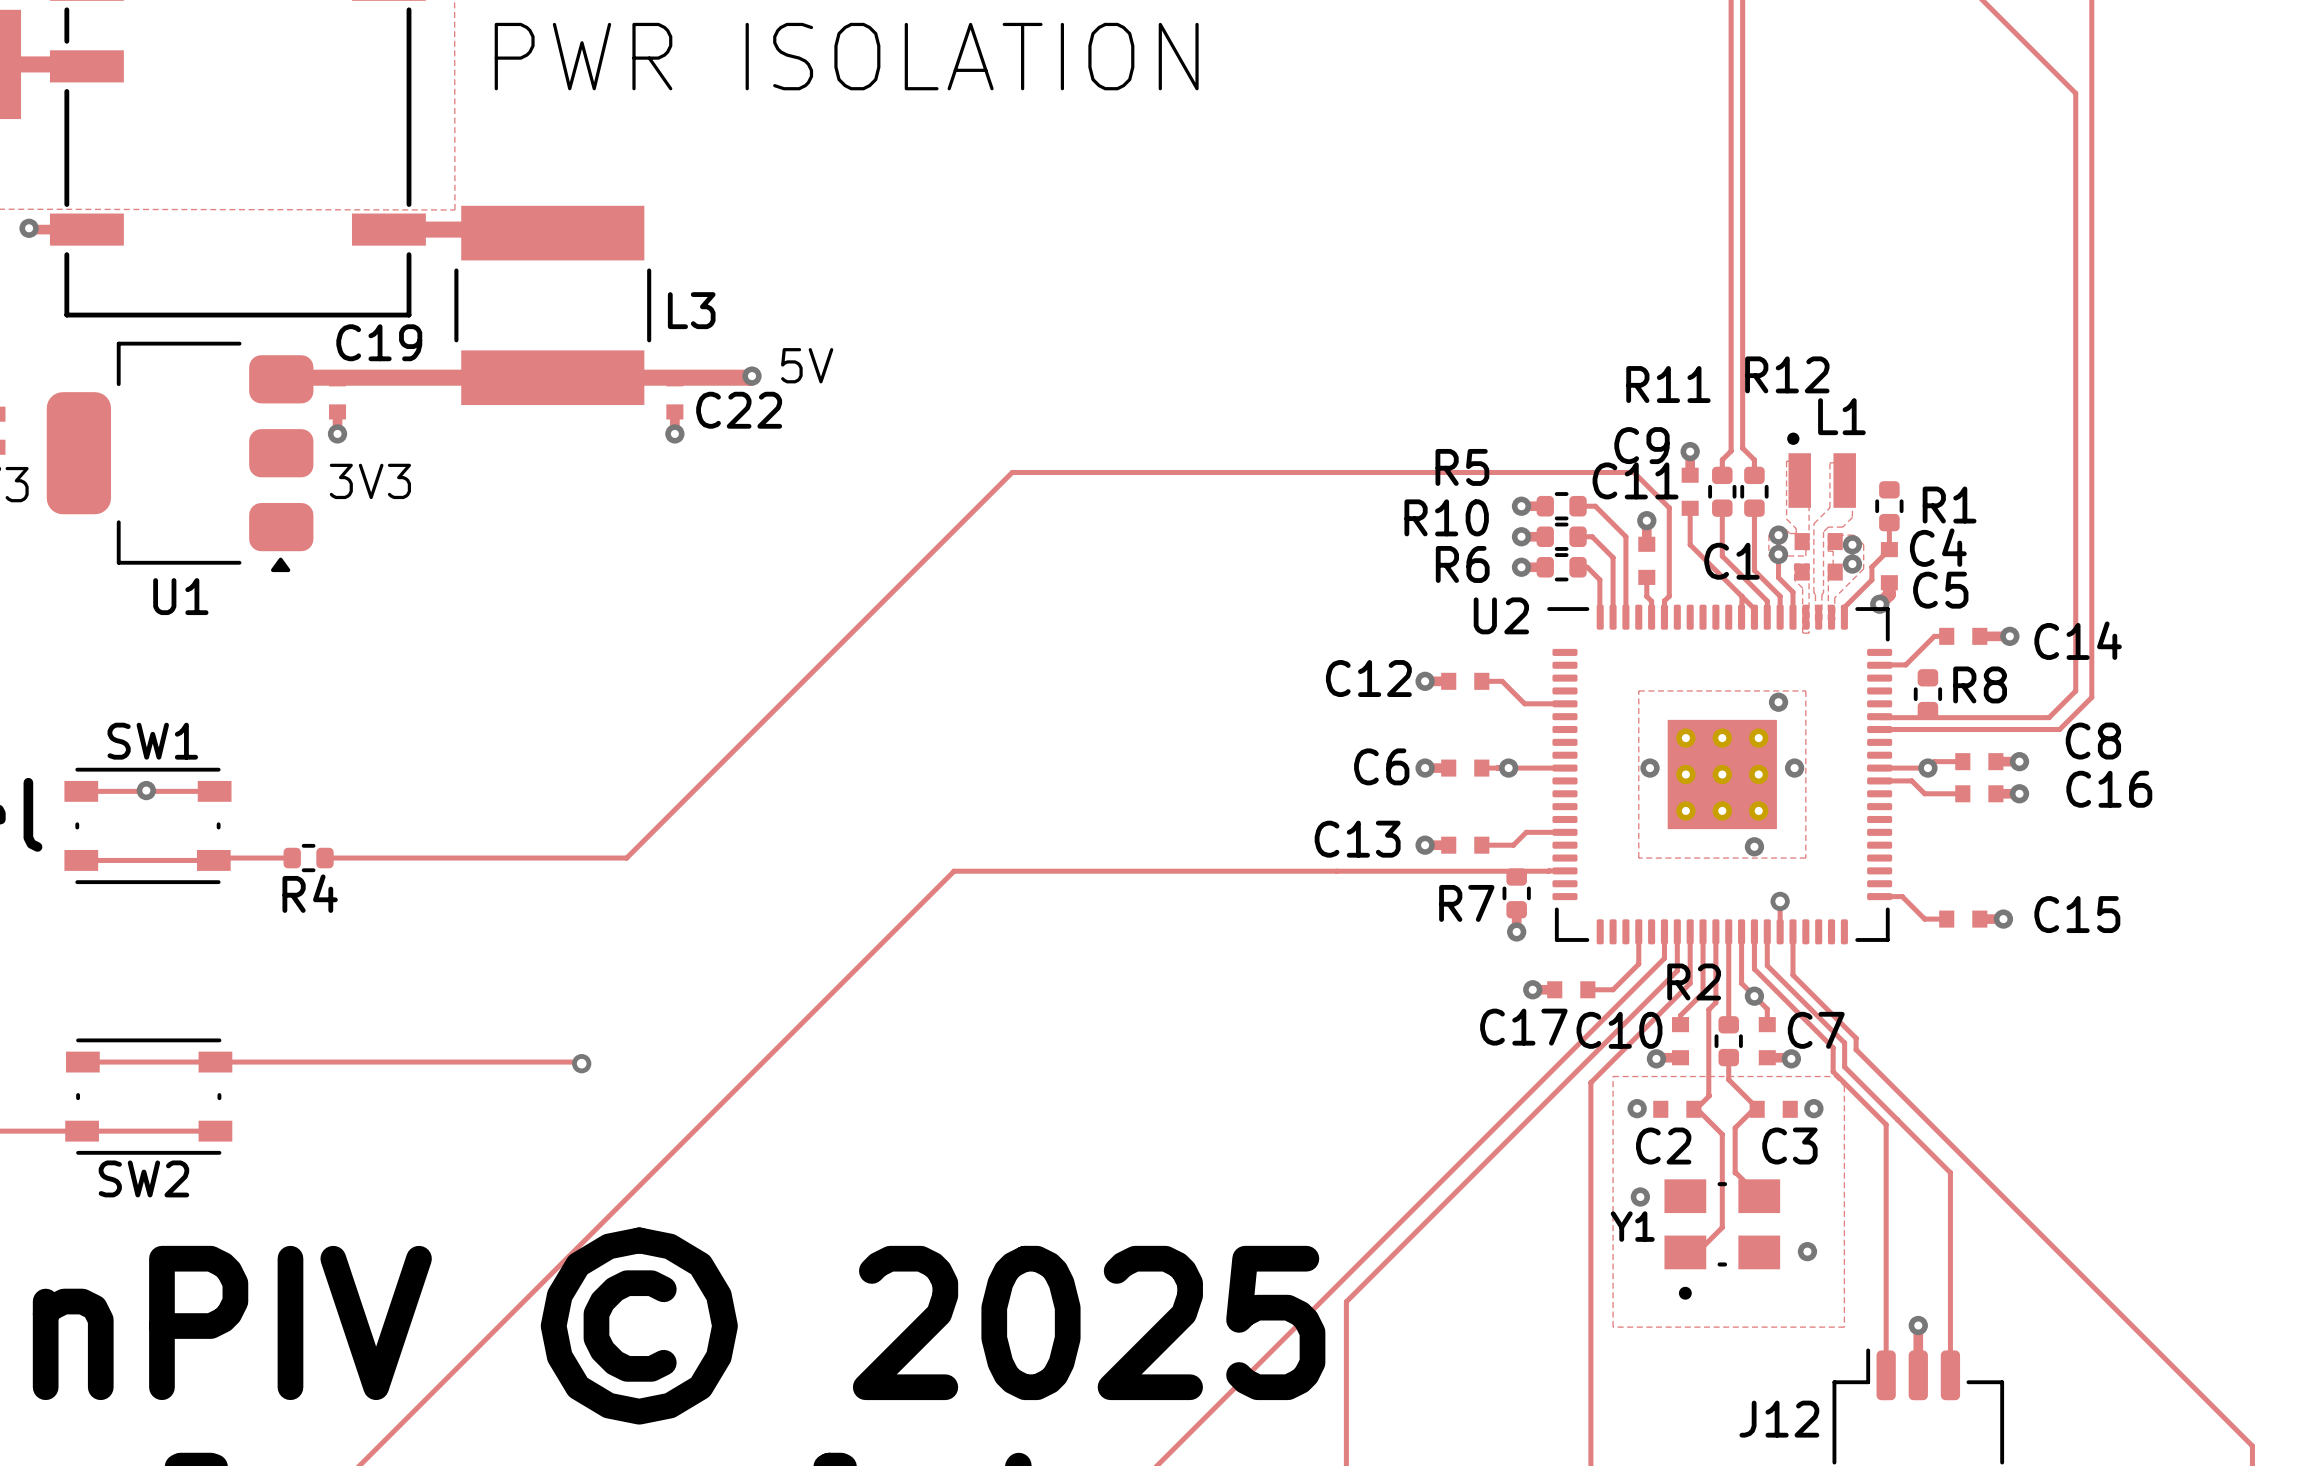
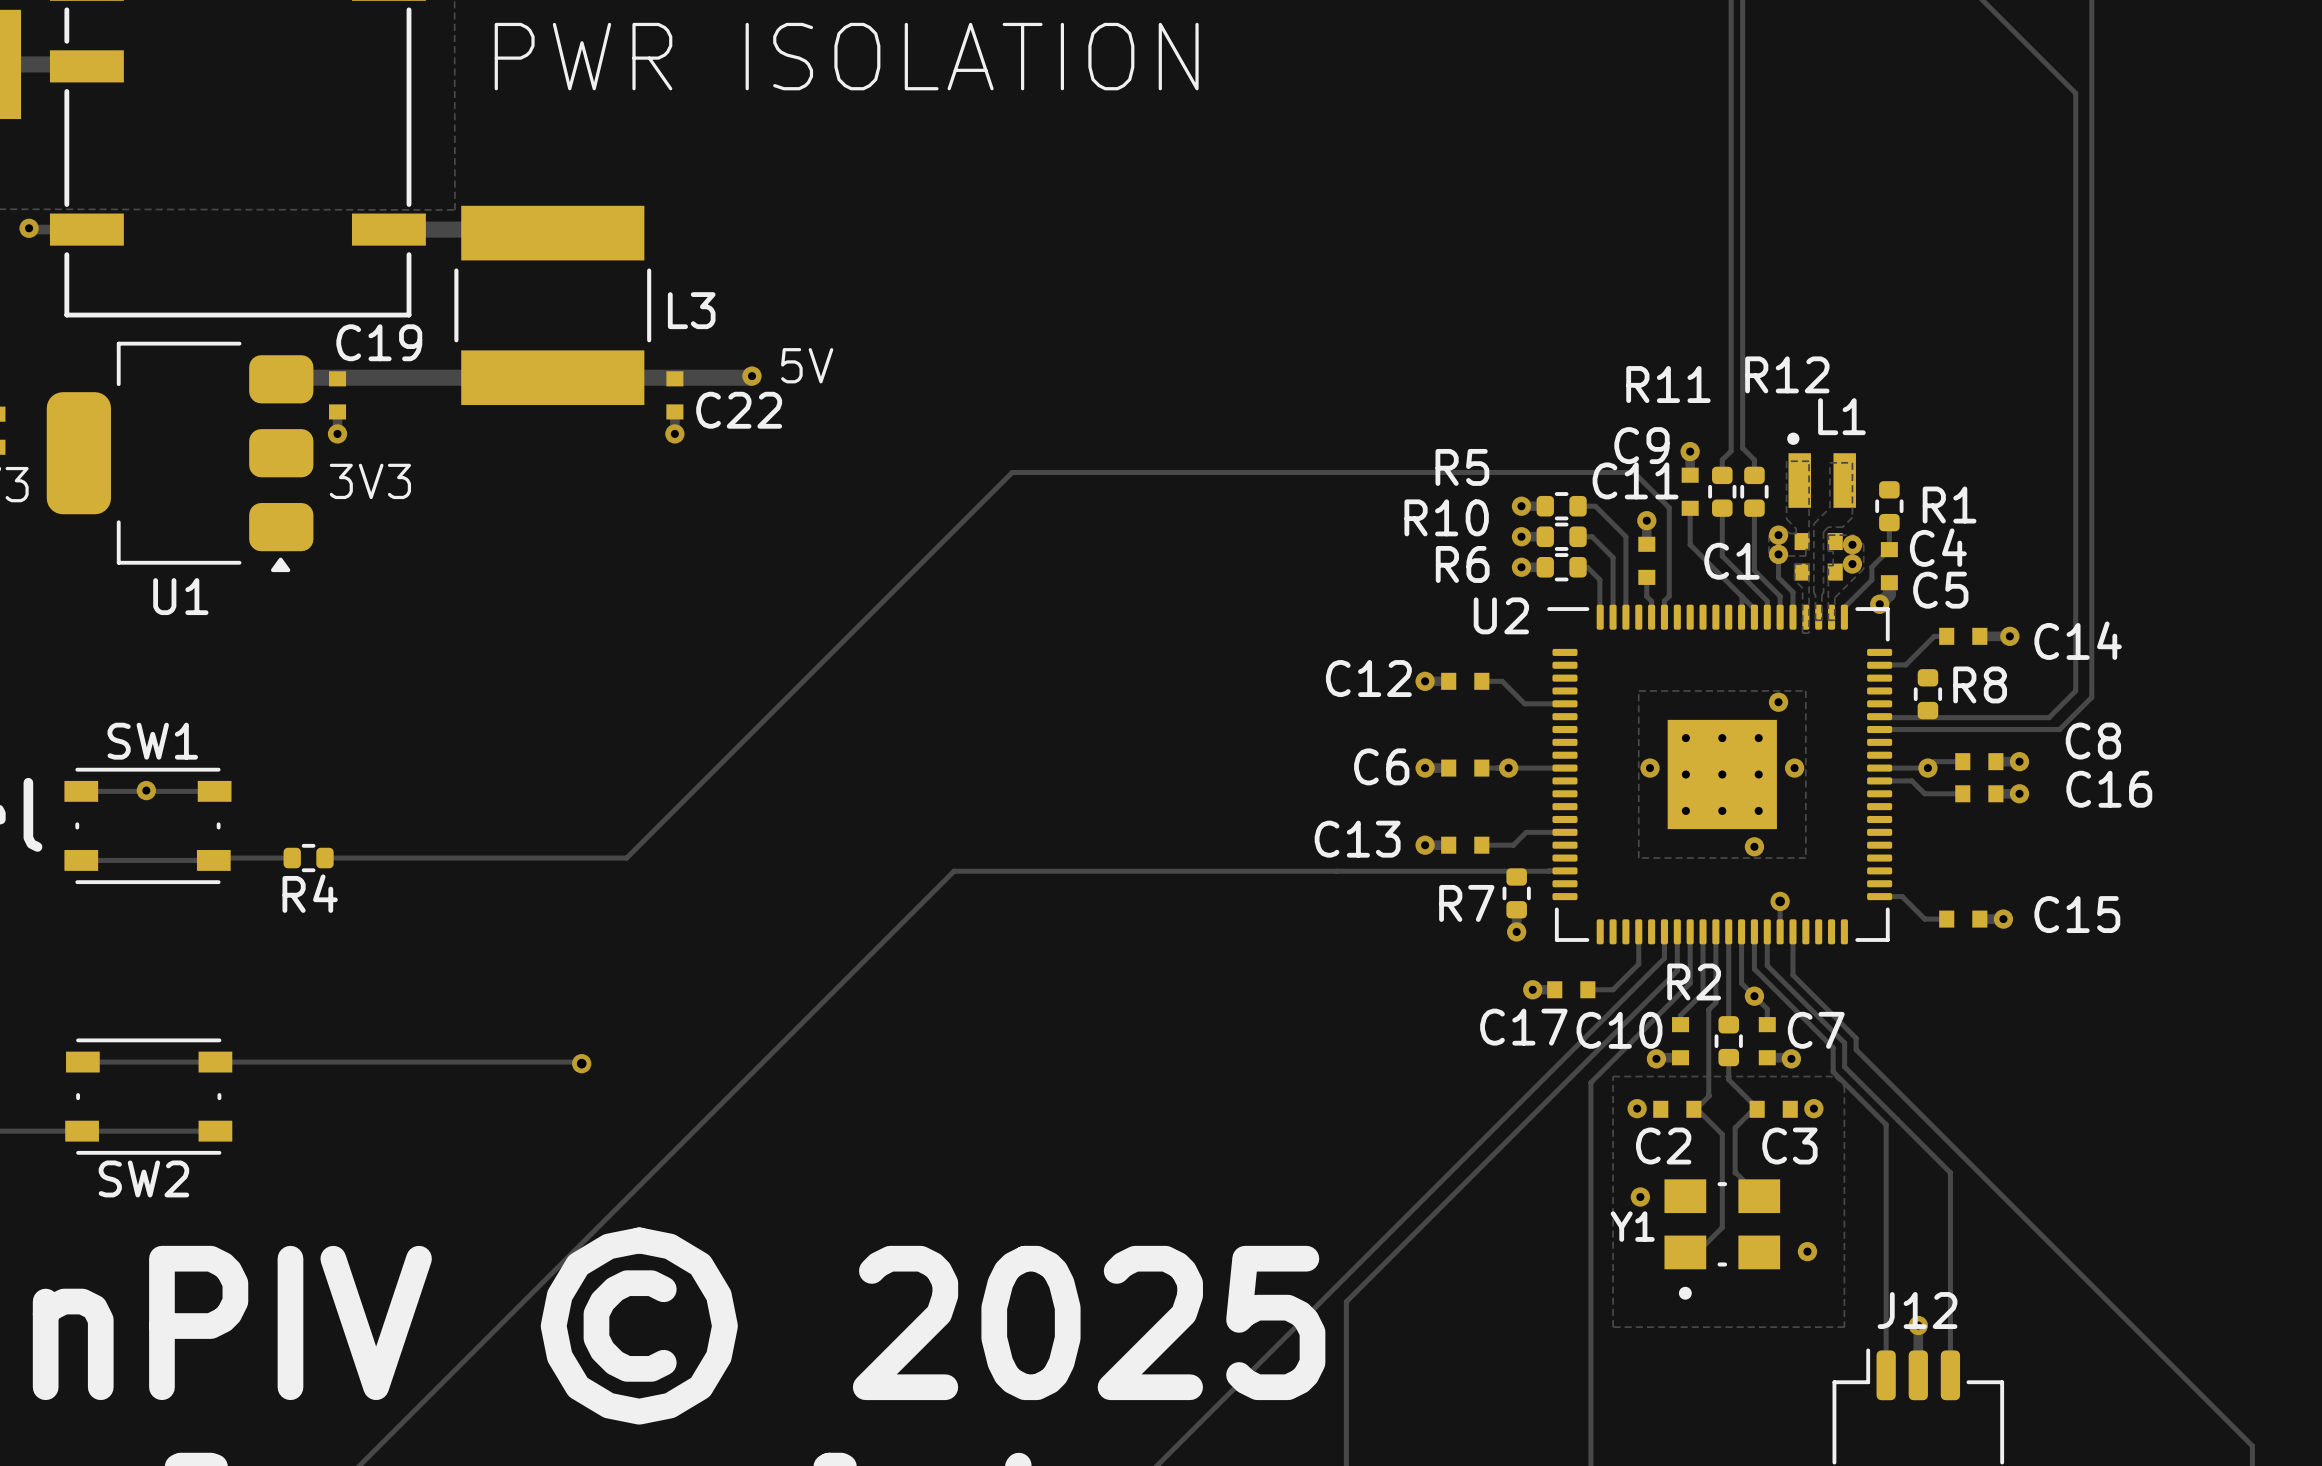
J12 name position: J12 (1779, 1419) -> J12 (1917, 1310)

